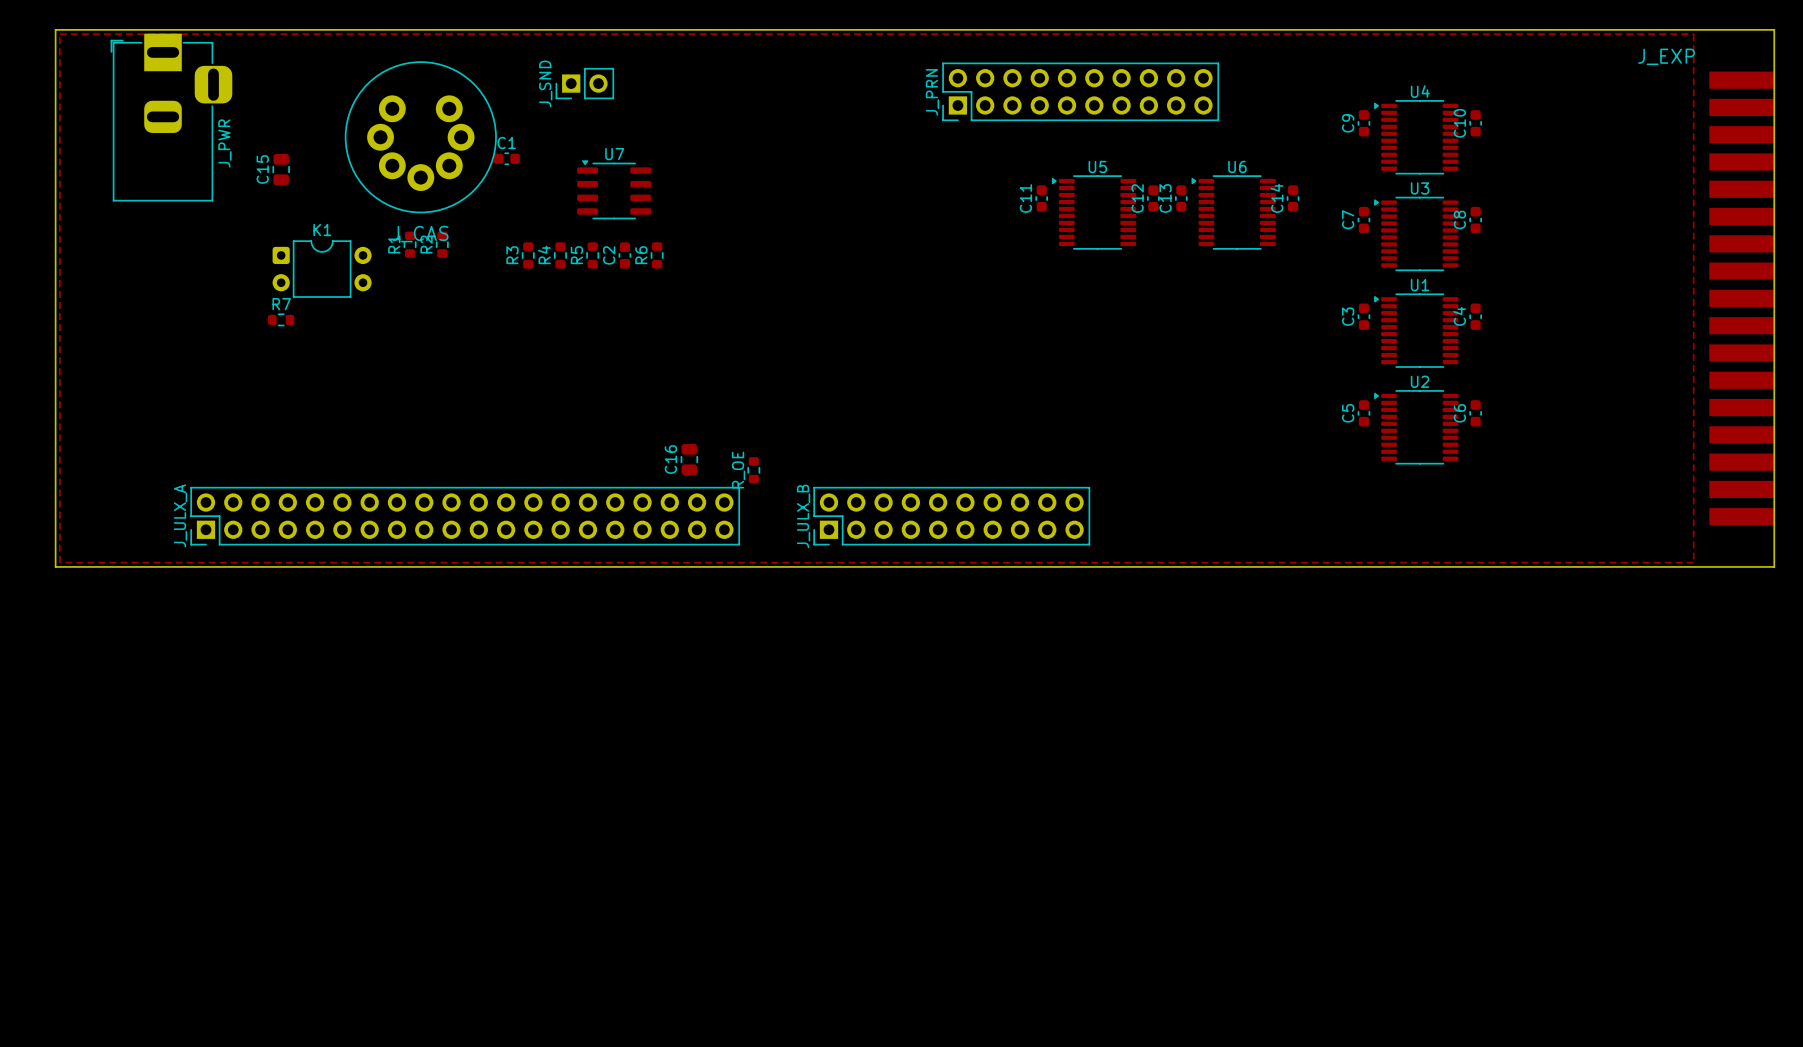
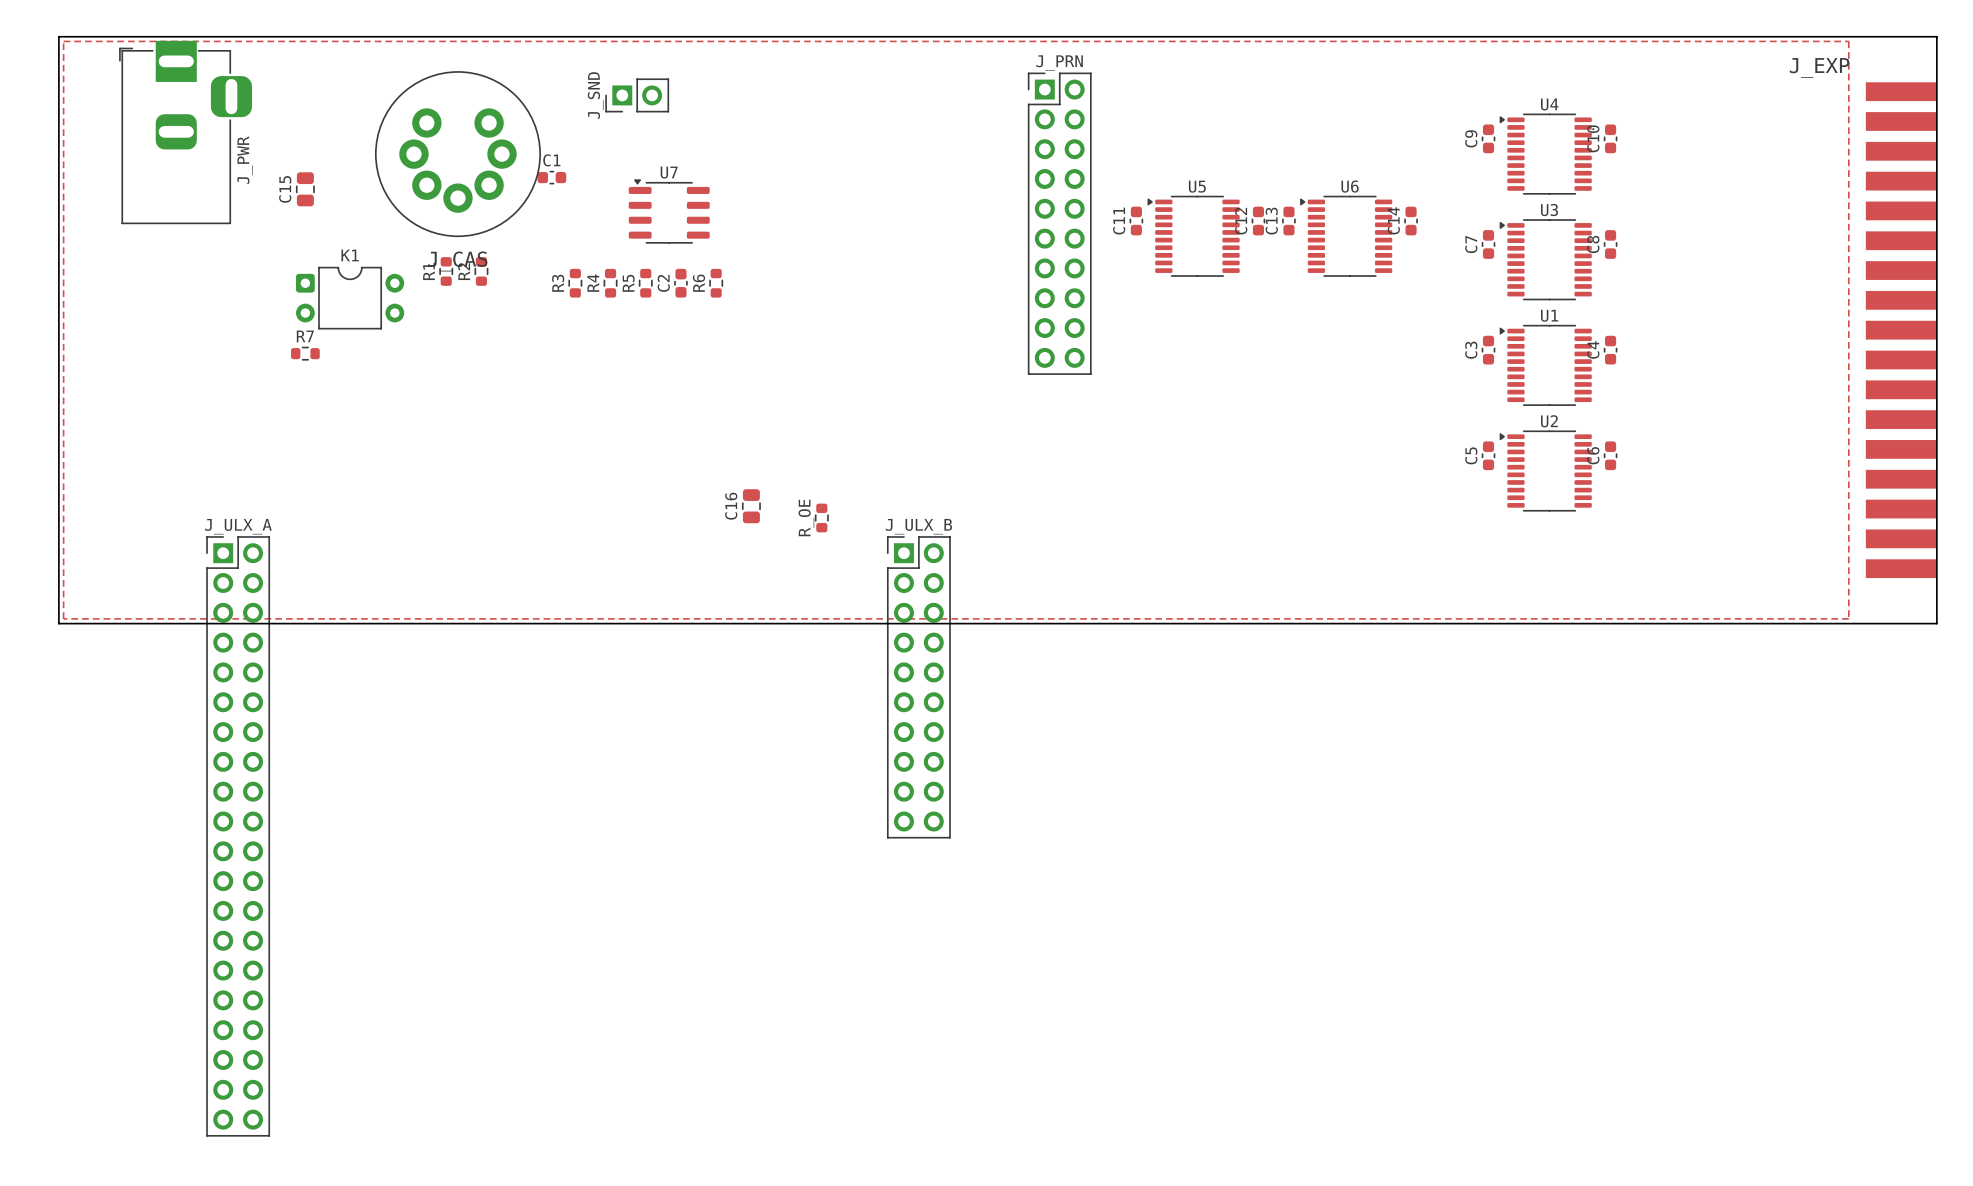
J_PRN rotation: 0° (1080, 91) -> 90° clockwise (1059, 223)
J_ULX_A: (465, 516) -> none
J_ULX_B rotation: 0° (951, 516) -> 90° clockwise (918, 687)
J_ULX_A: none -> (238, 836)

